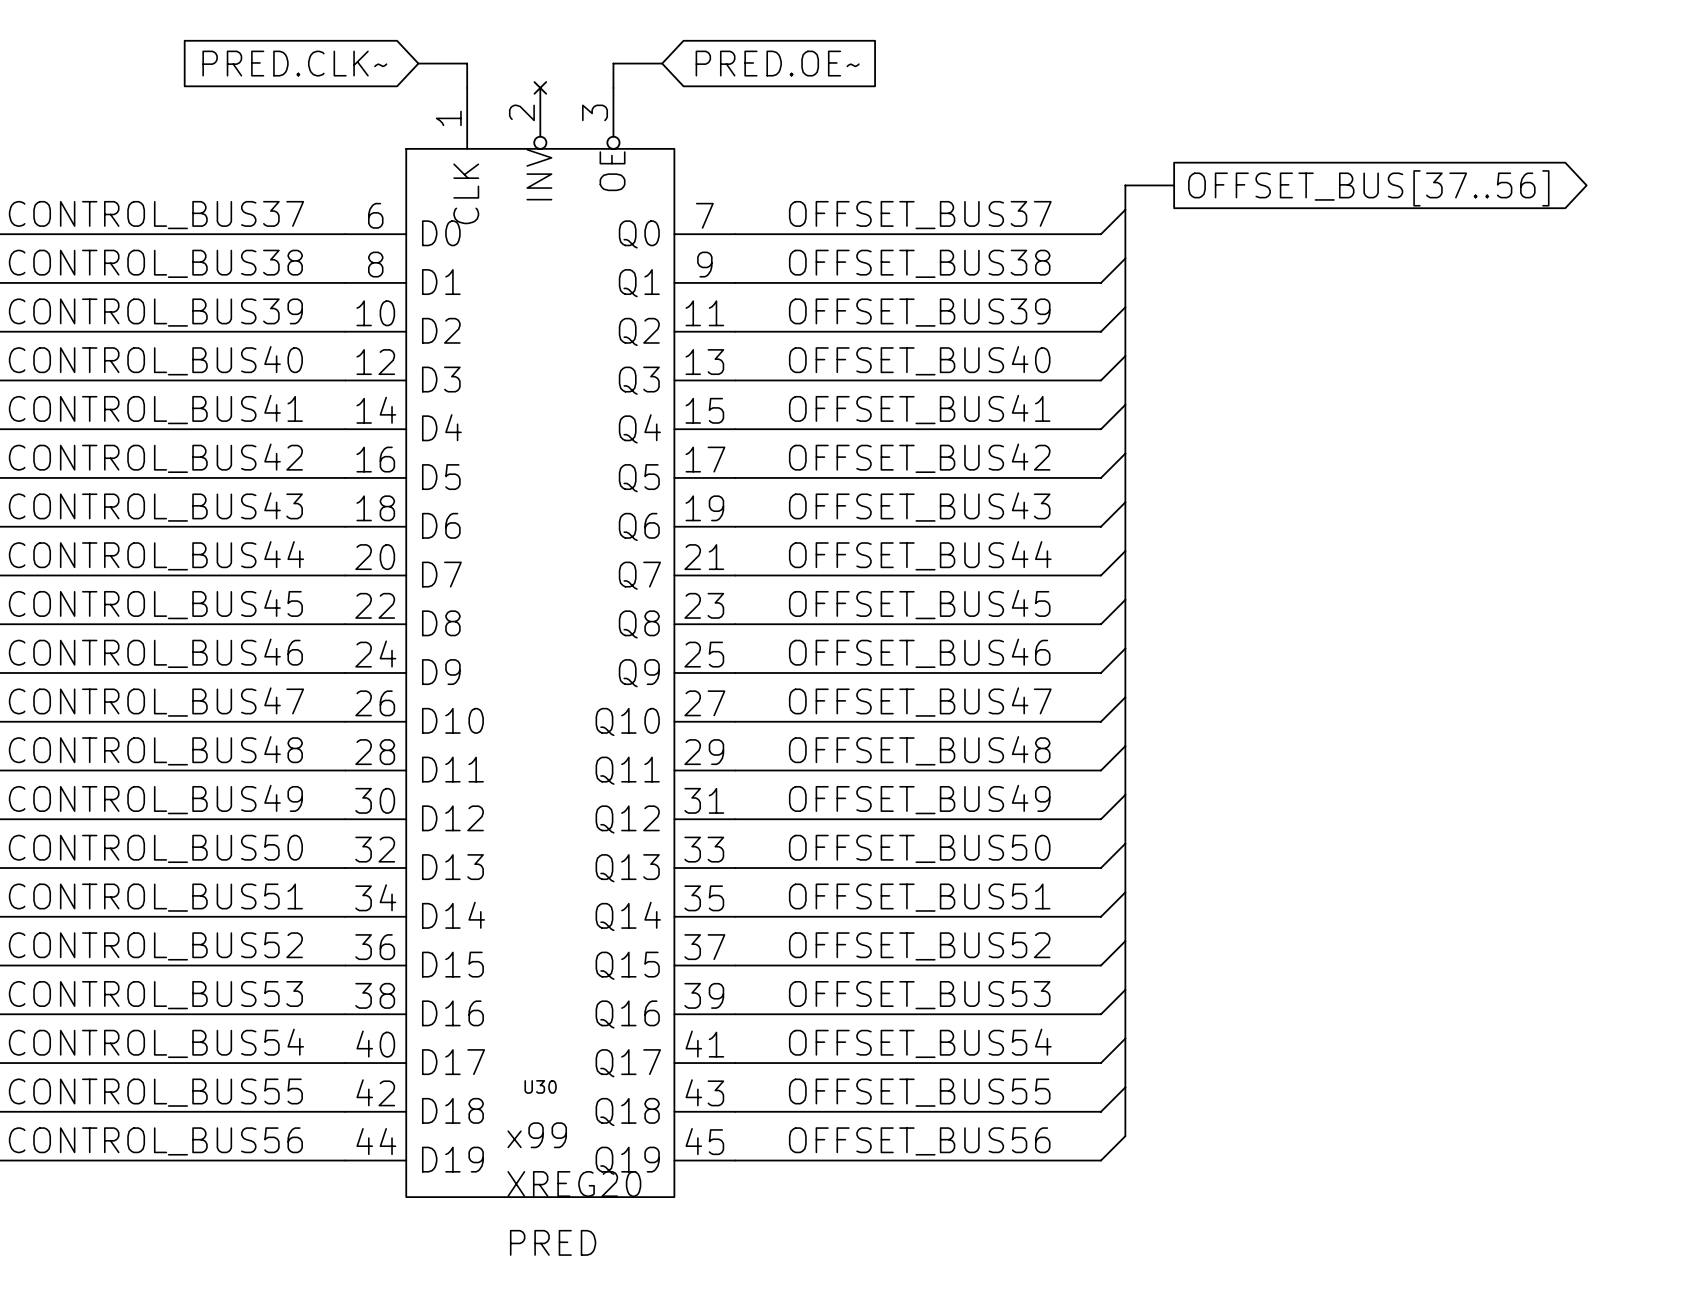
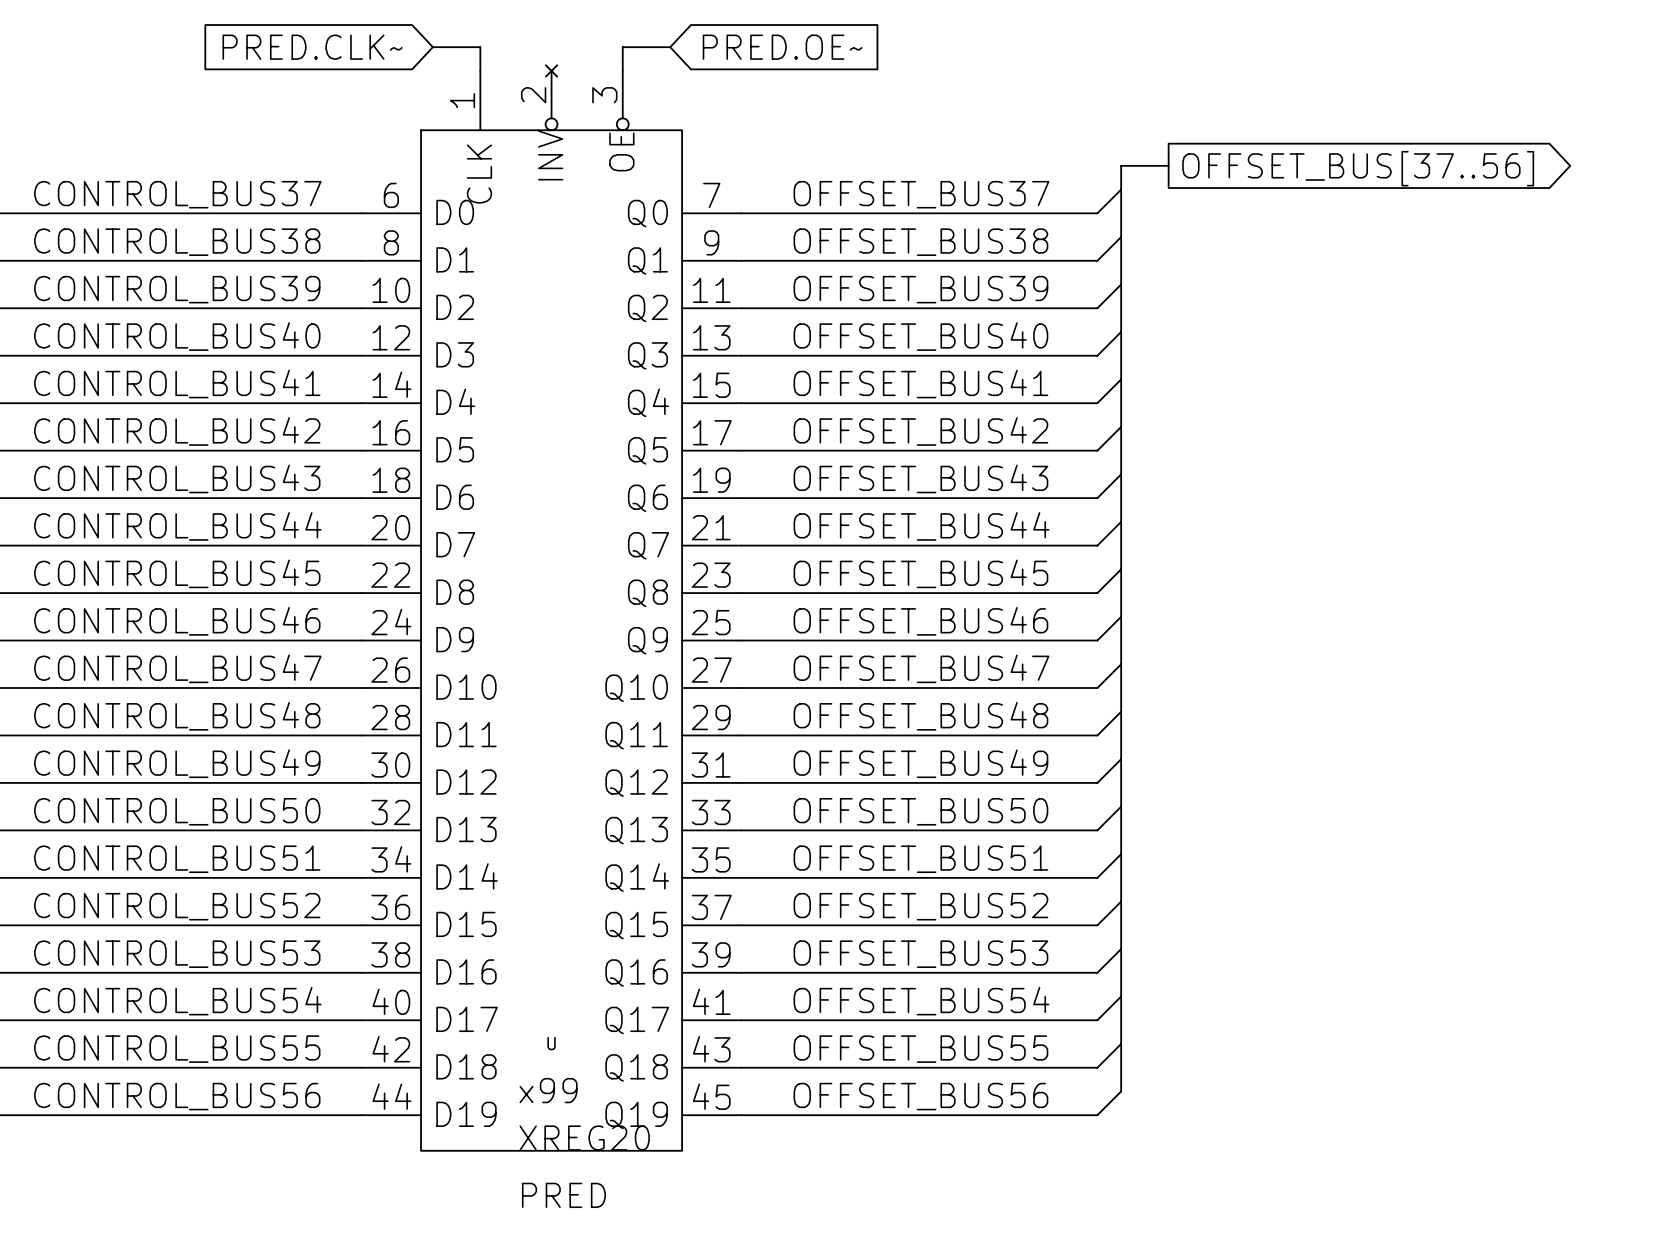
U30 name: U30 (540, 1086) -> U (551, 1043)

